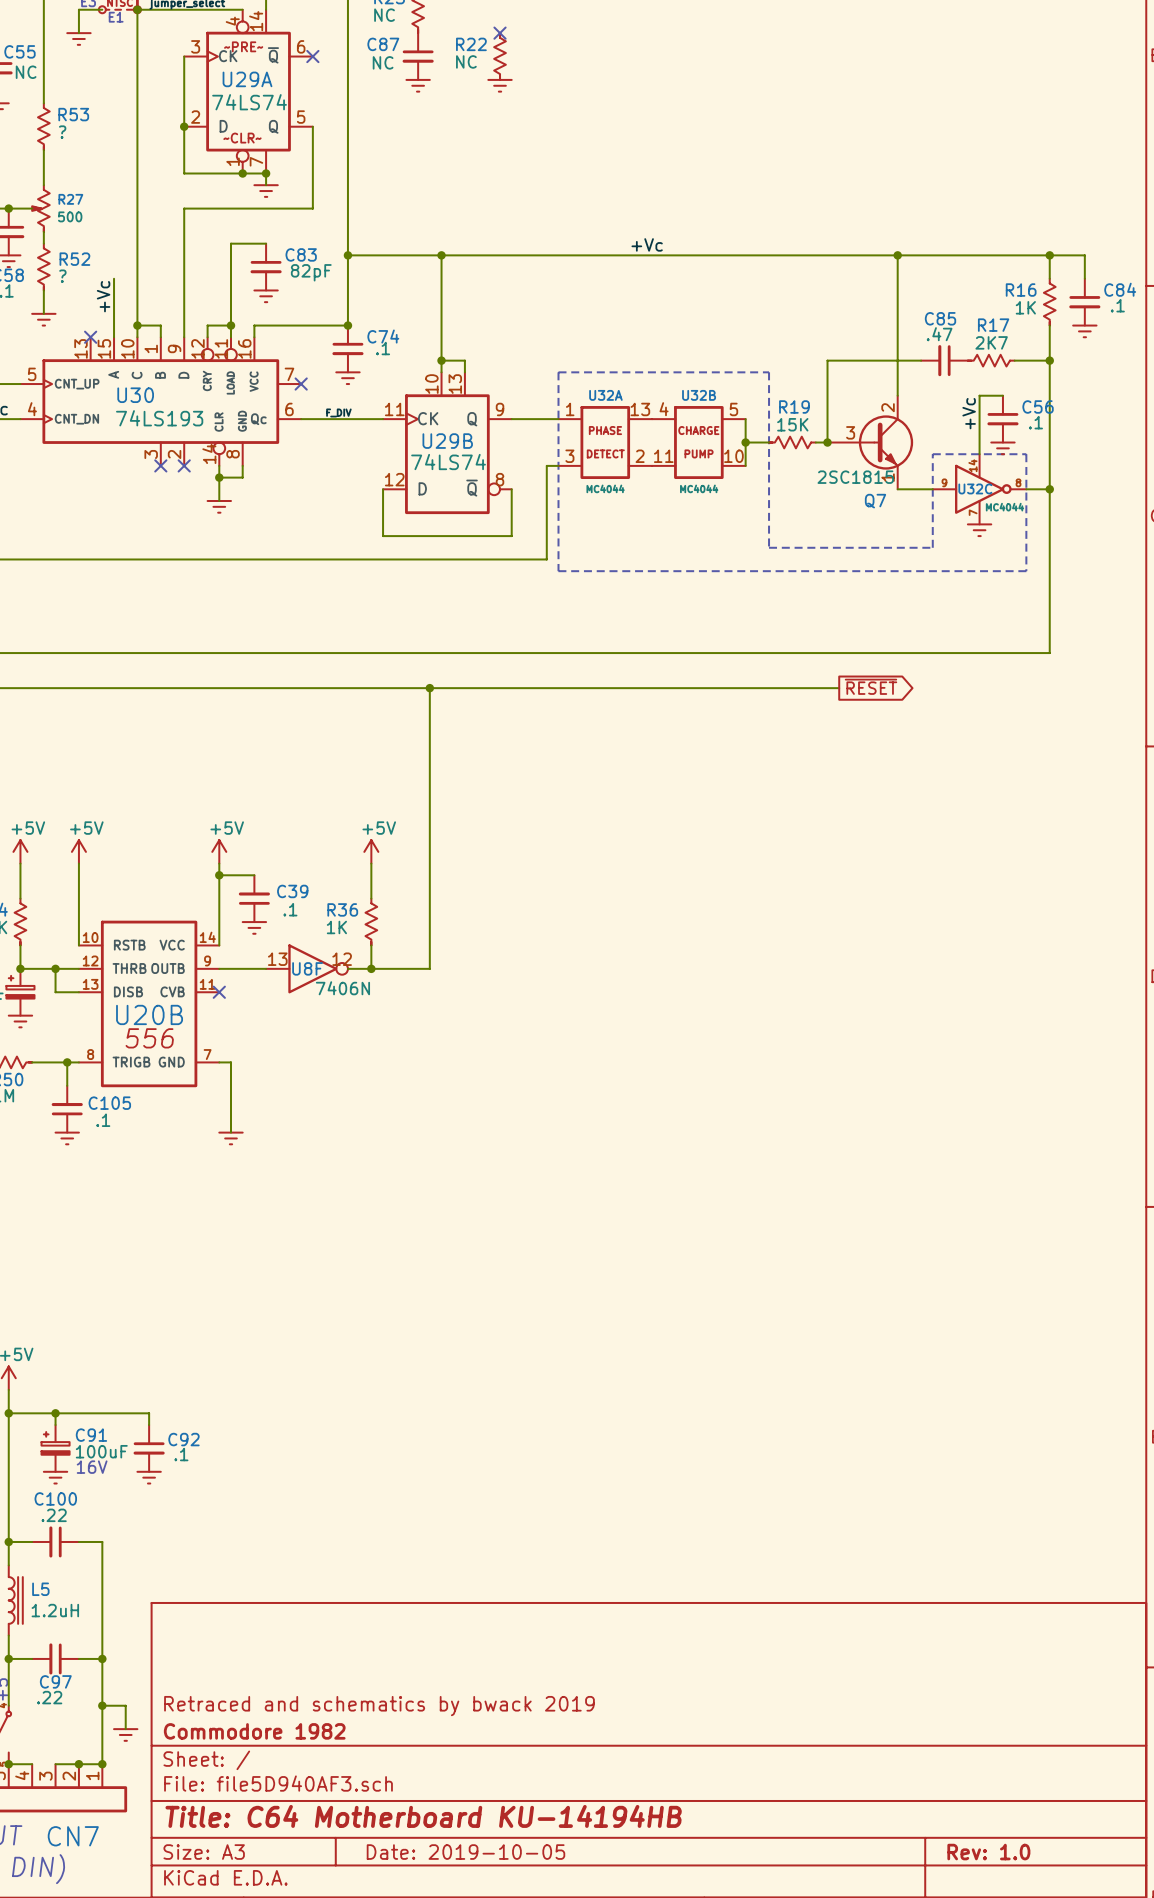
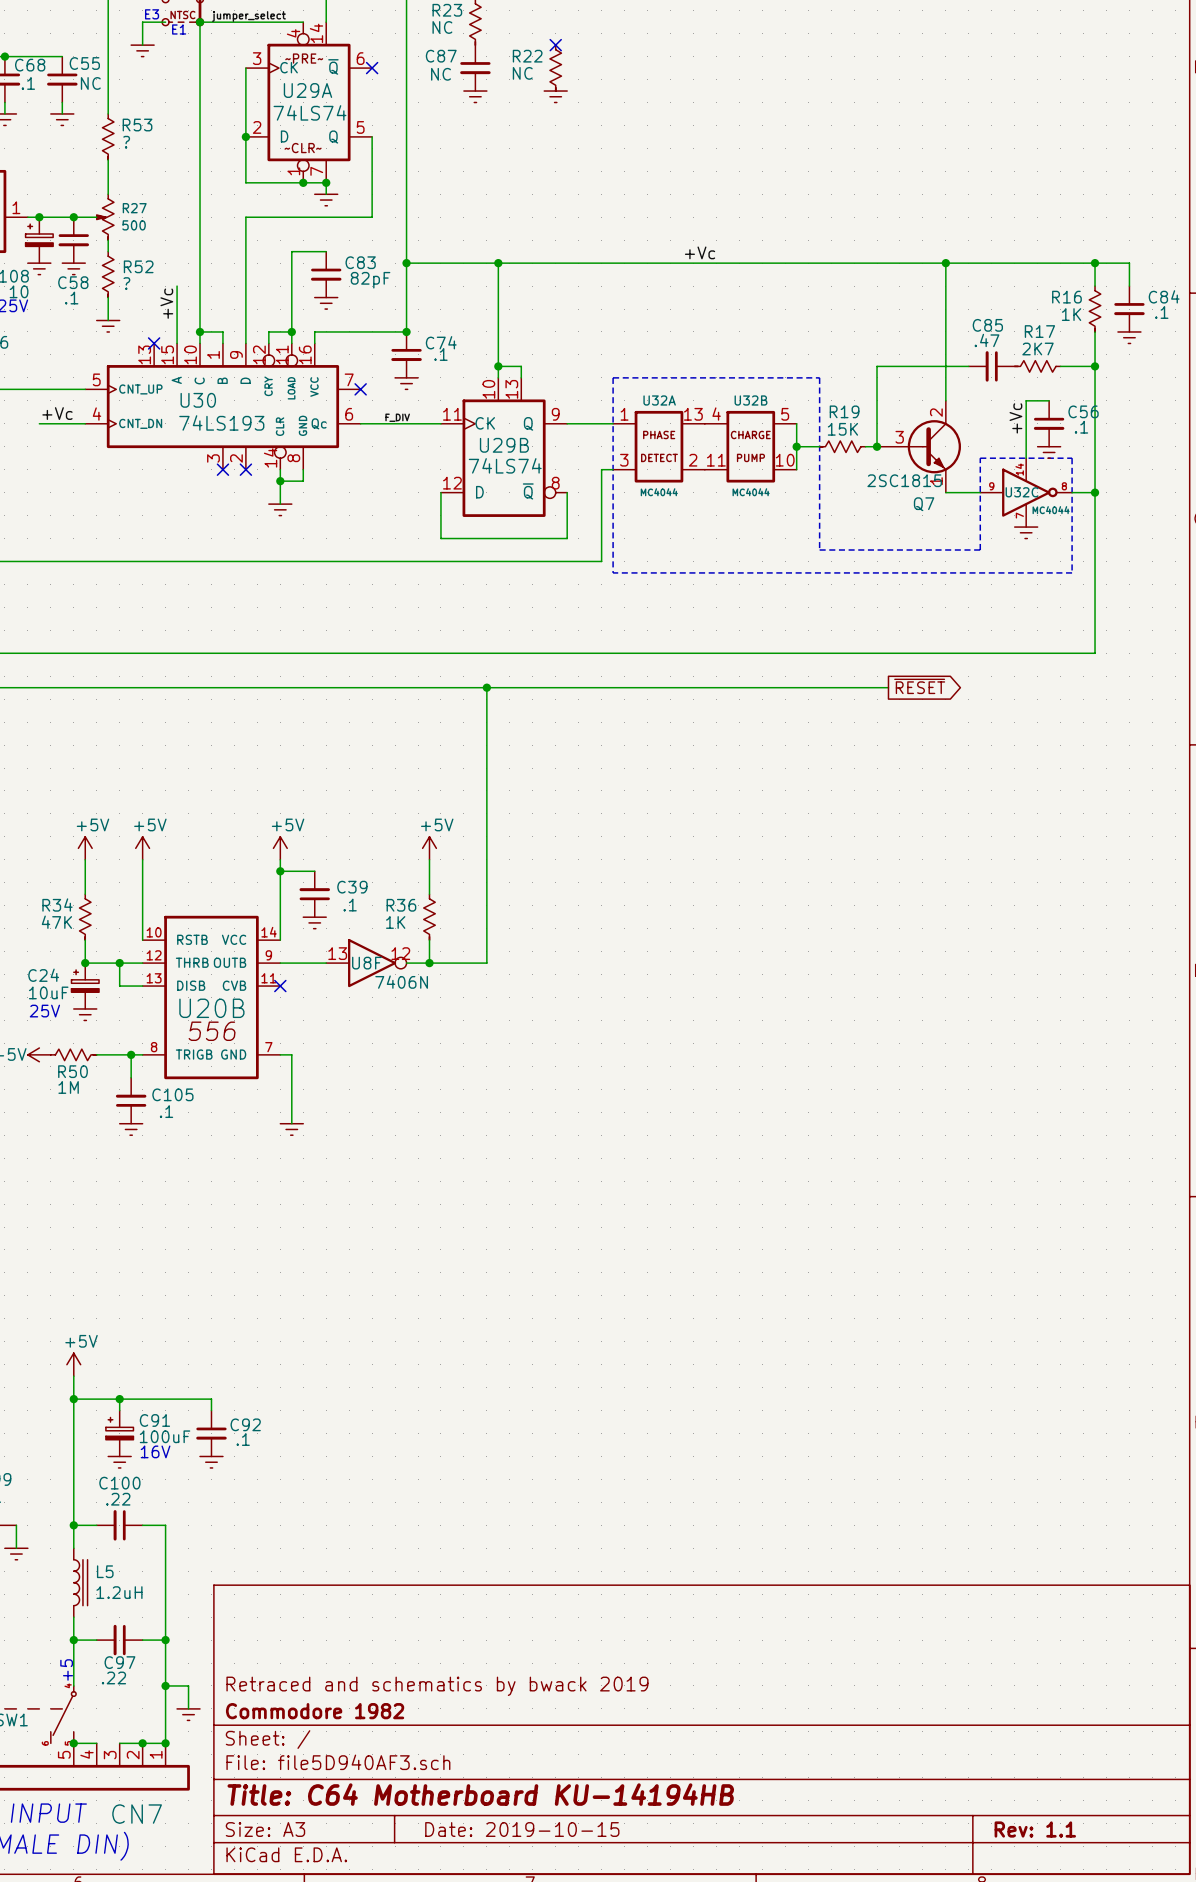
title block: Date: 2019-10-05 (465, 1852) -> Date: 2019-10-15 (522, 1829)
title block: Rev: 1.0 (988, 1852) -> Rev: 1.1 (1035, 1829)

